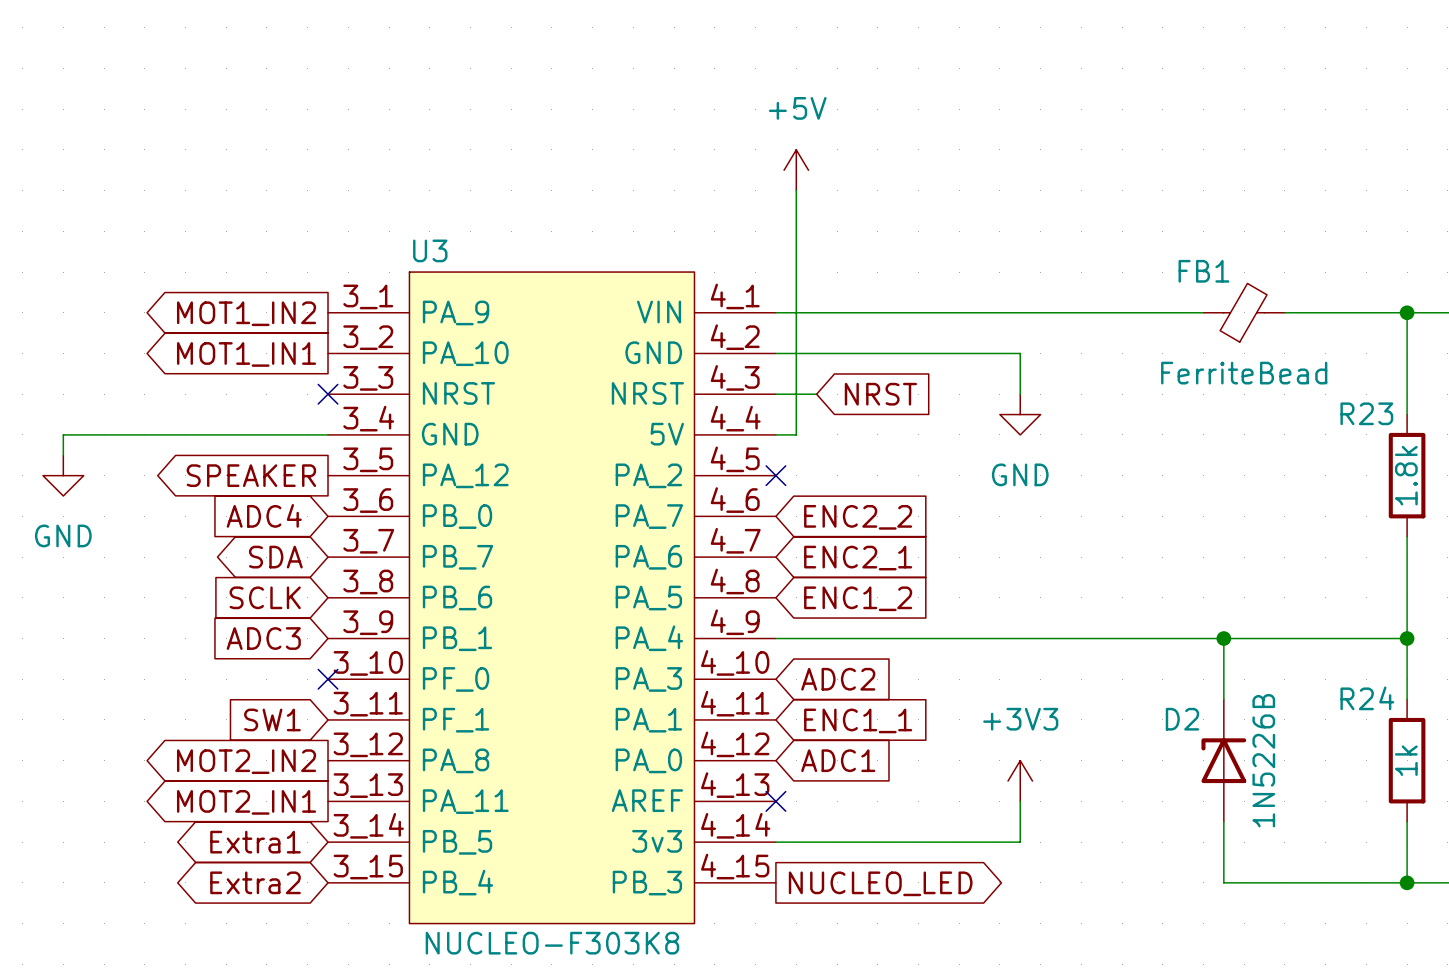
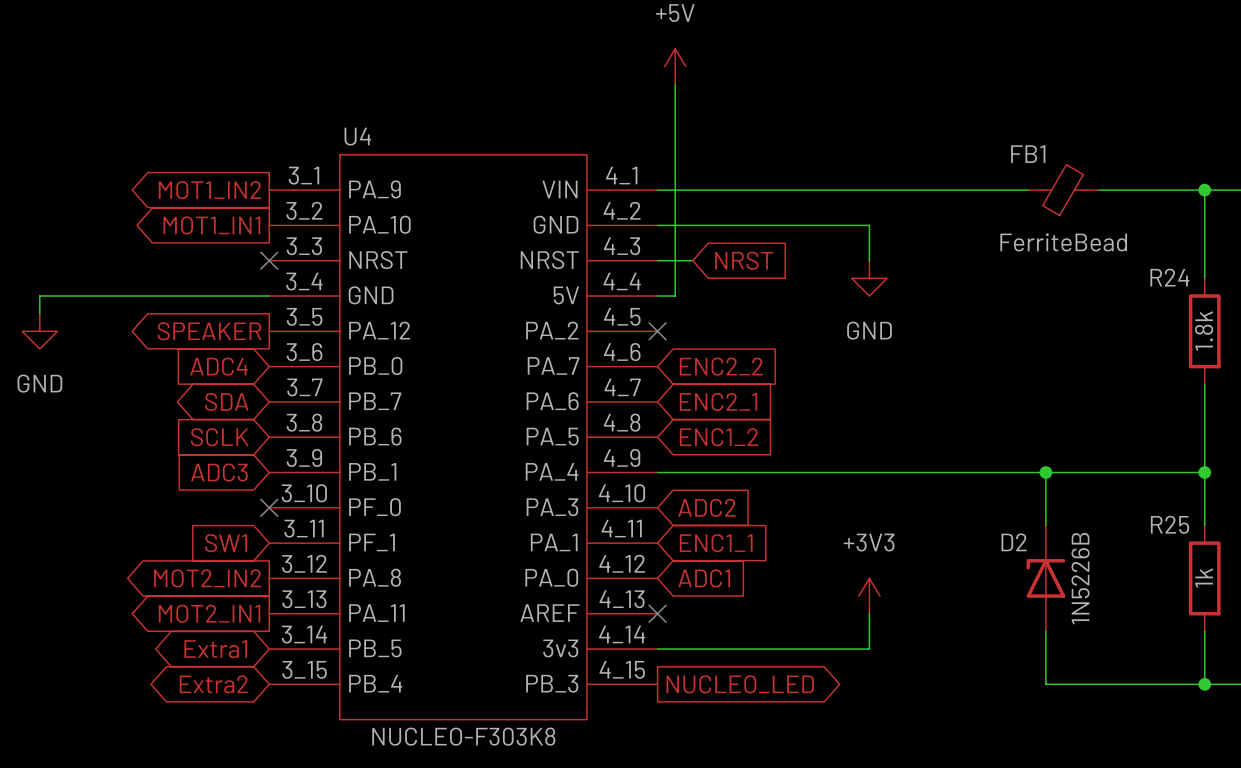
U3 name: U3 (430, 250) -> U4 (357, 136)
R23 name: R23 (1366, 413) -> R24 (1169, 277)
R24 name: R24 (1367, 698) -> R25 (1170, 524)

